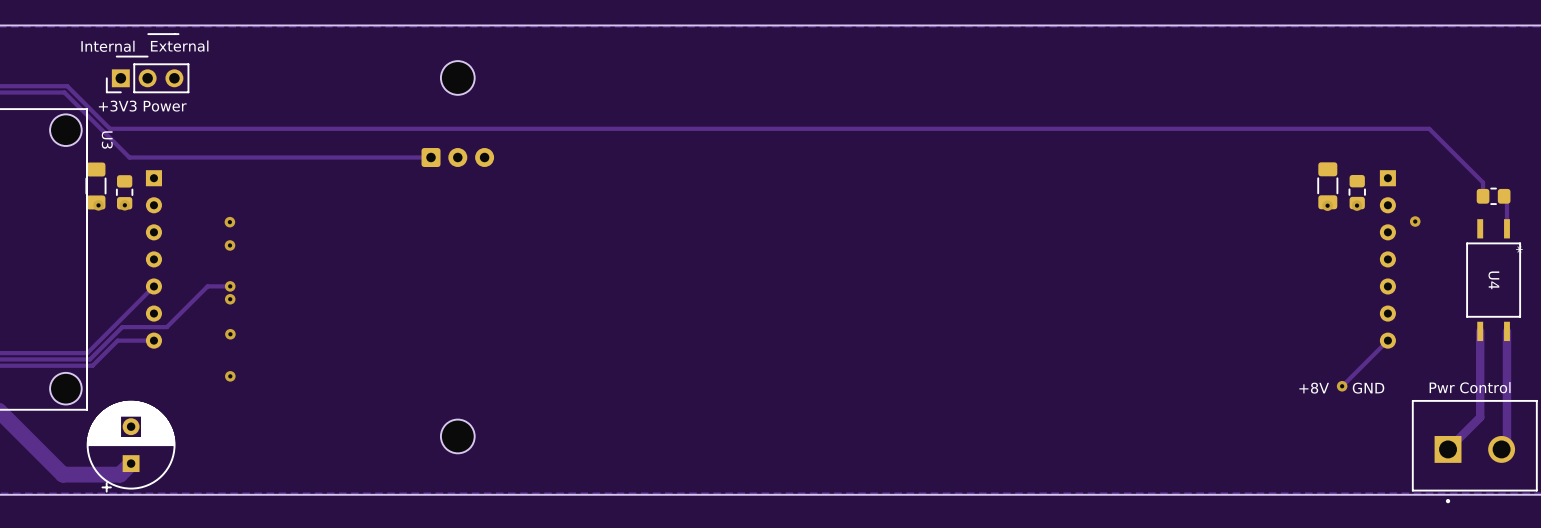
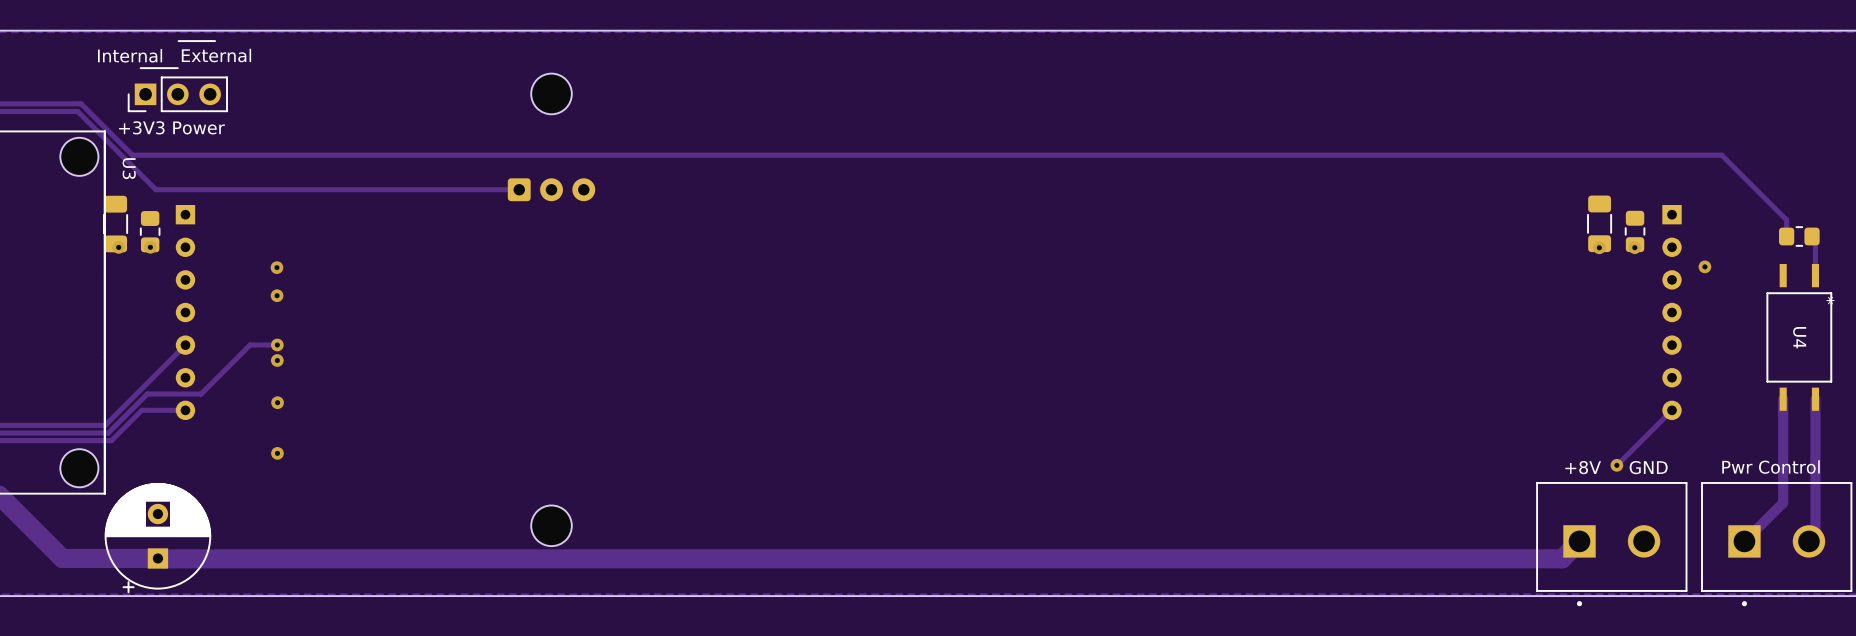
part: none -> (1611, 544)
track: (131, 463) (120, 474) (62, 474) (51, 463) -> (1579, 541) (1562, 558) (62, 558)

